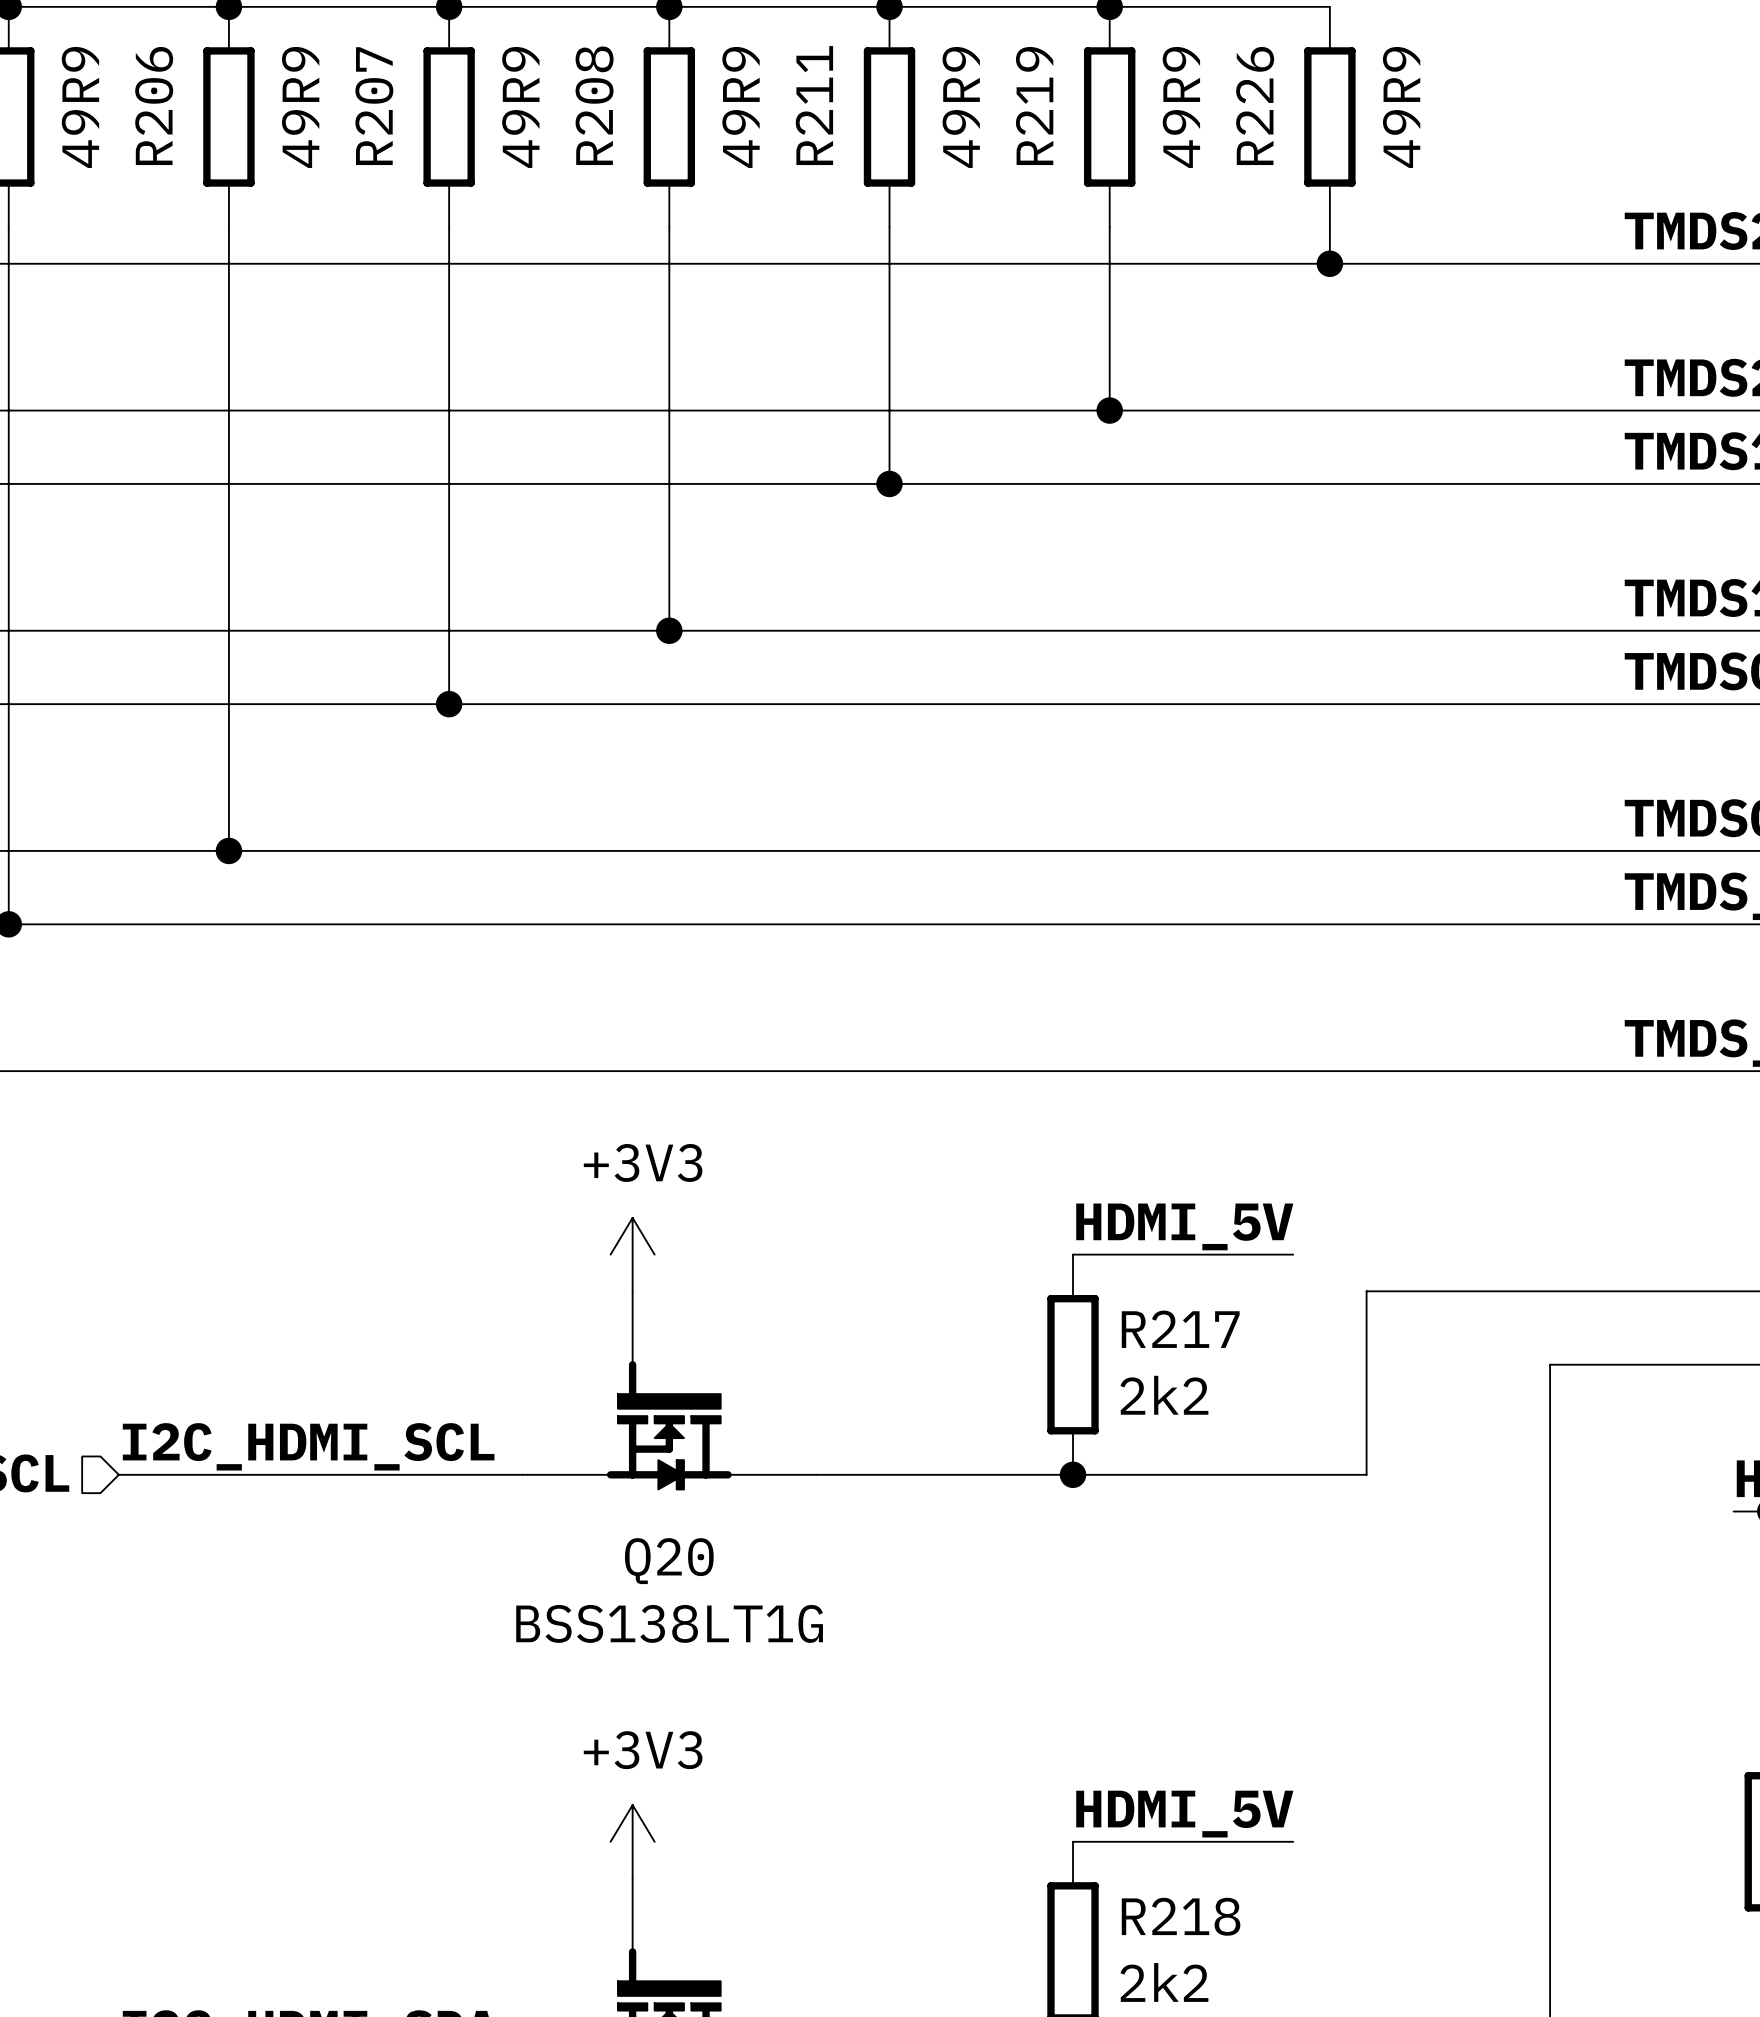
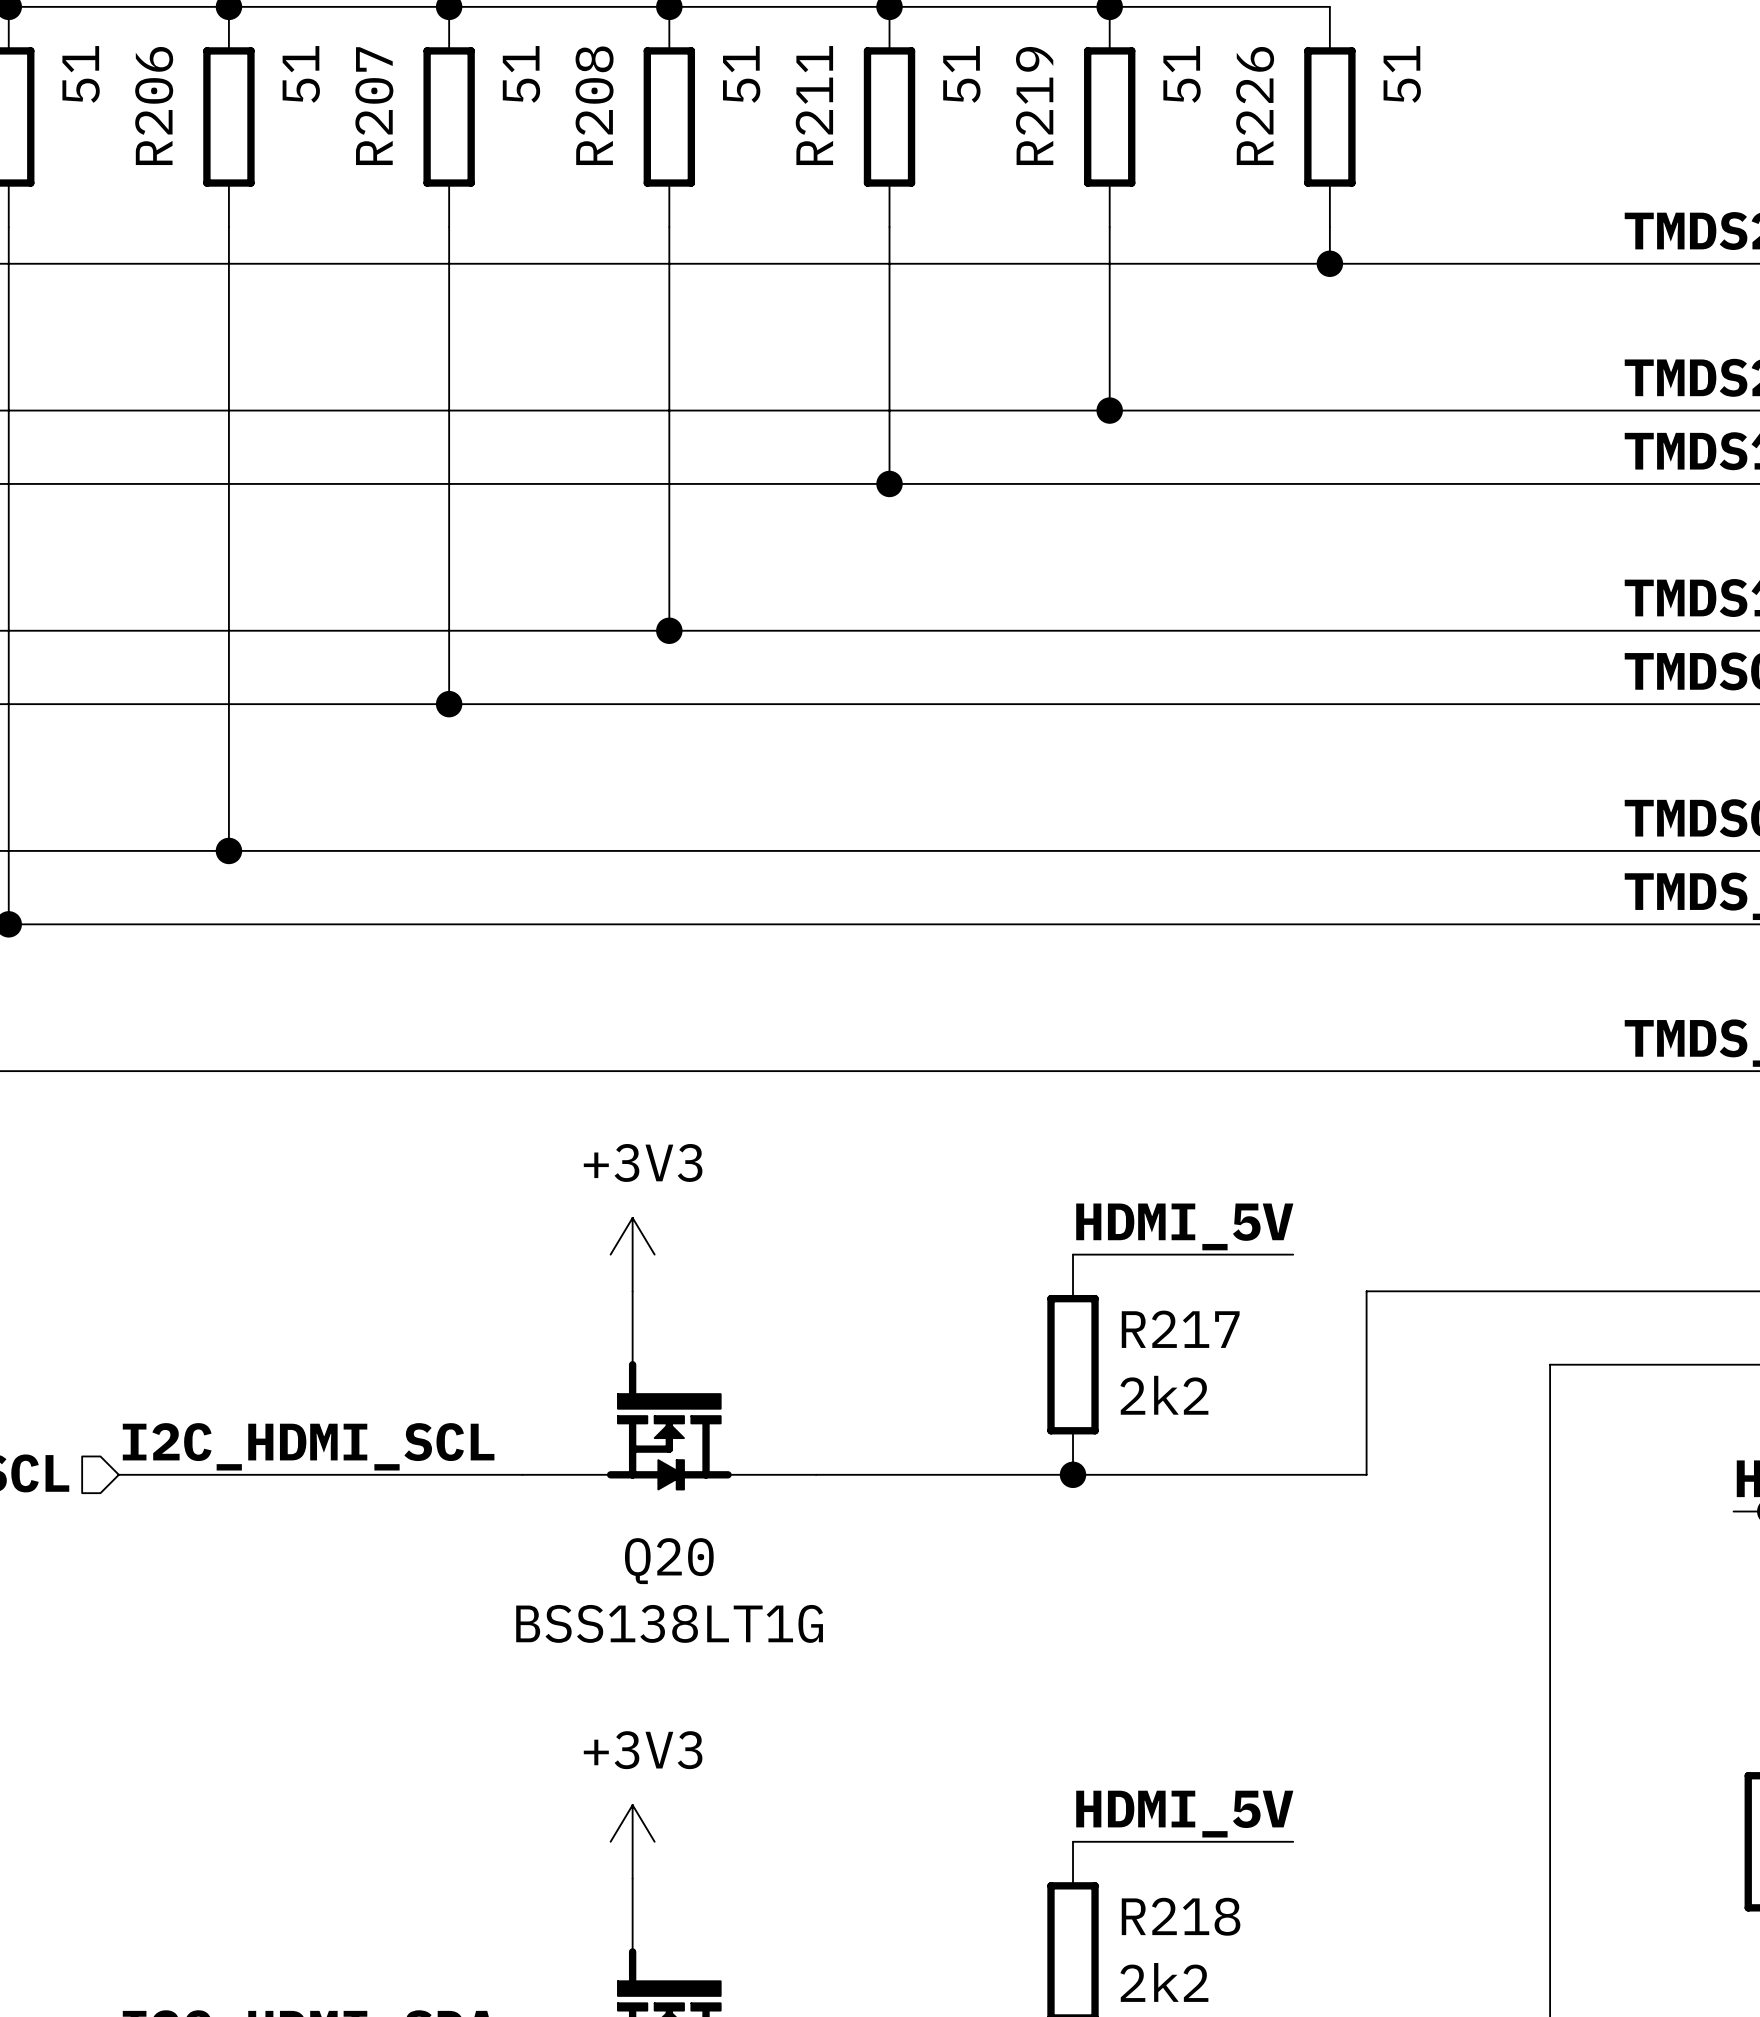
part text: 49R9 (80, 107) -> 51 (81, 74)
R206 text: 49R9 (300, 107) -> 51 (301, 74)
R207 text: 49R9 (520, 107) -> 51 (521, 74)
R208 text: 49R9 (741, 107) -> 51 (741, 74)
R211 text: 49R9 (961, 107) -> 51 (961, 74)
R219 text: 49R9 (1181, 107) -> 51 (1182, 74)
R226 text: 49R9 (1401, 107) -> 51 (1402, 74)

